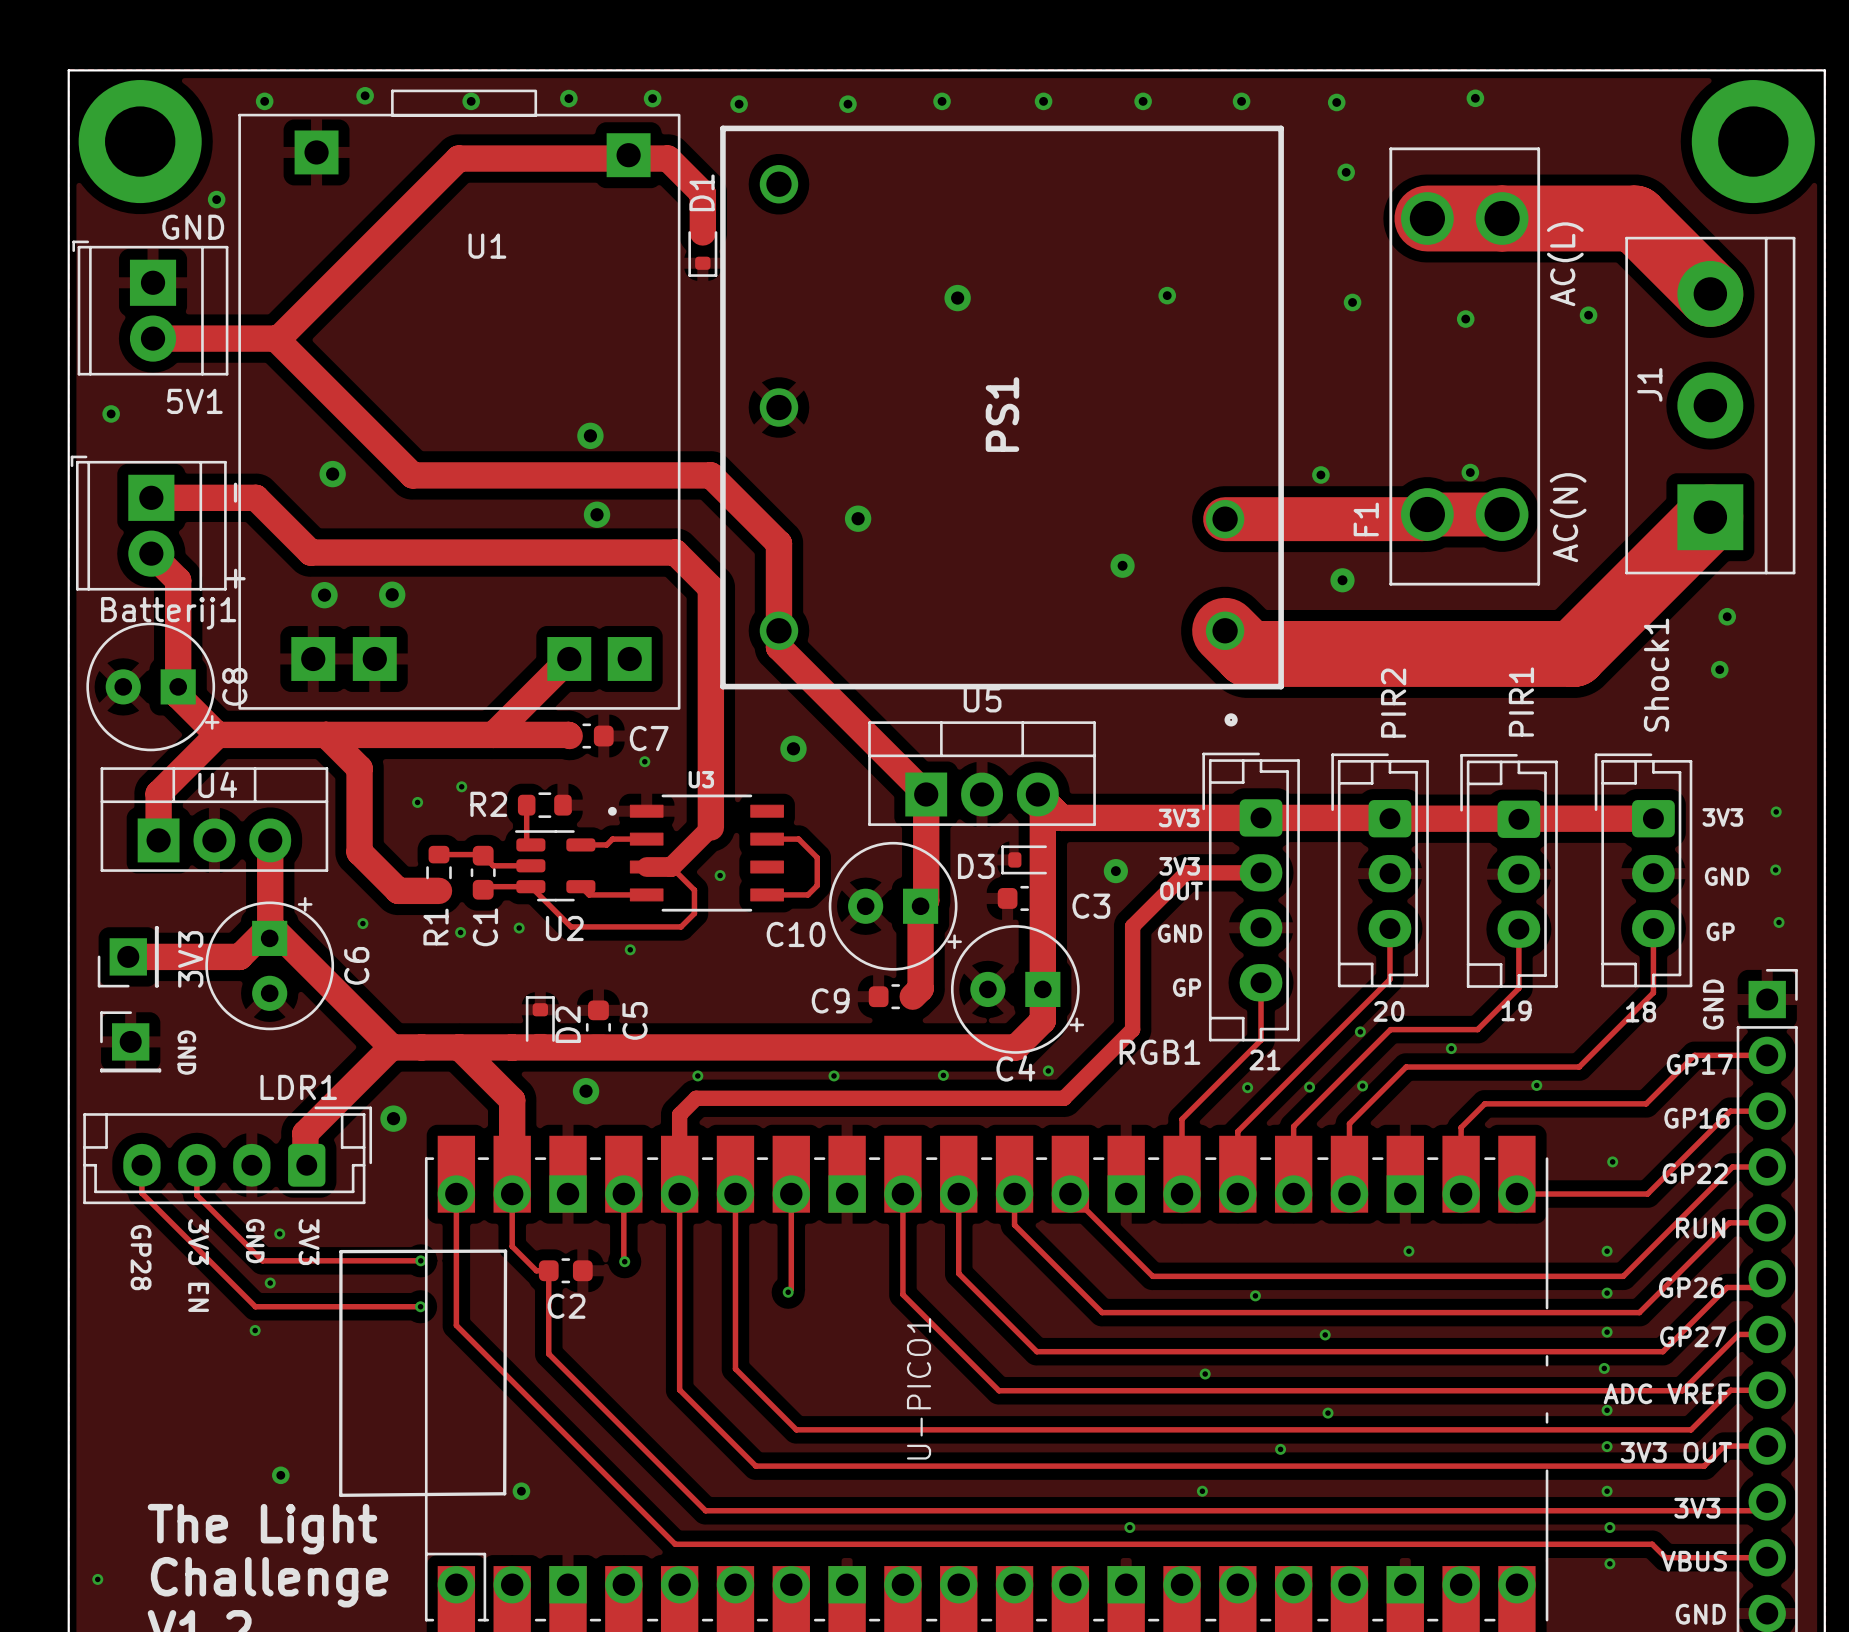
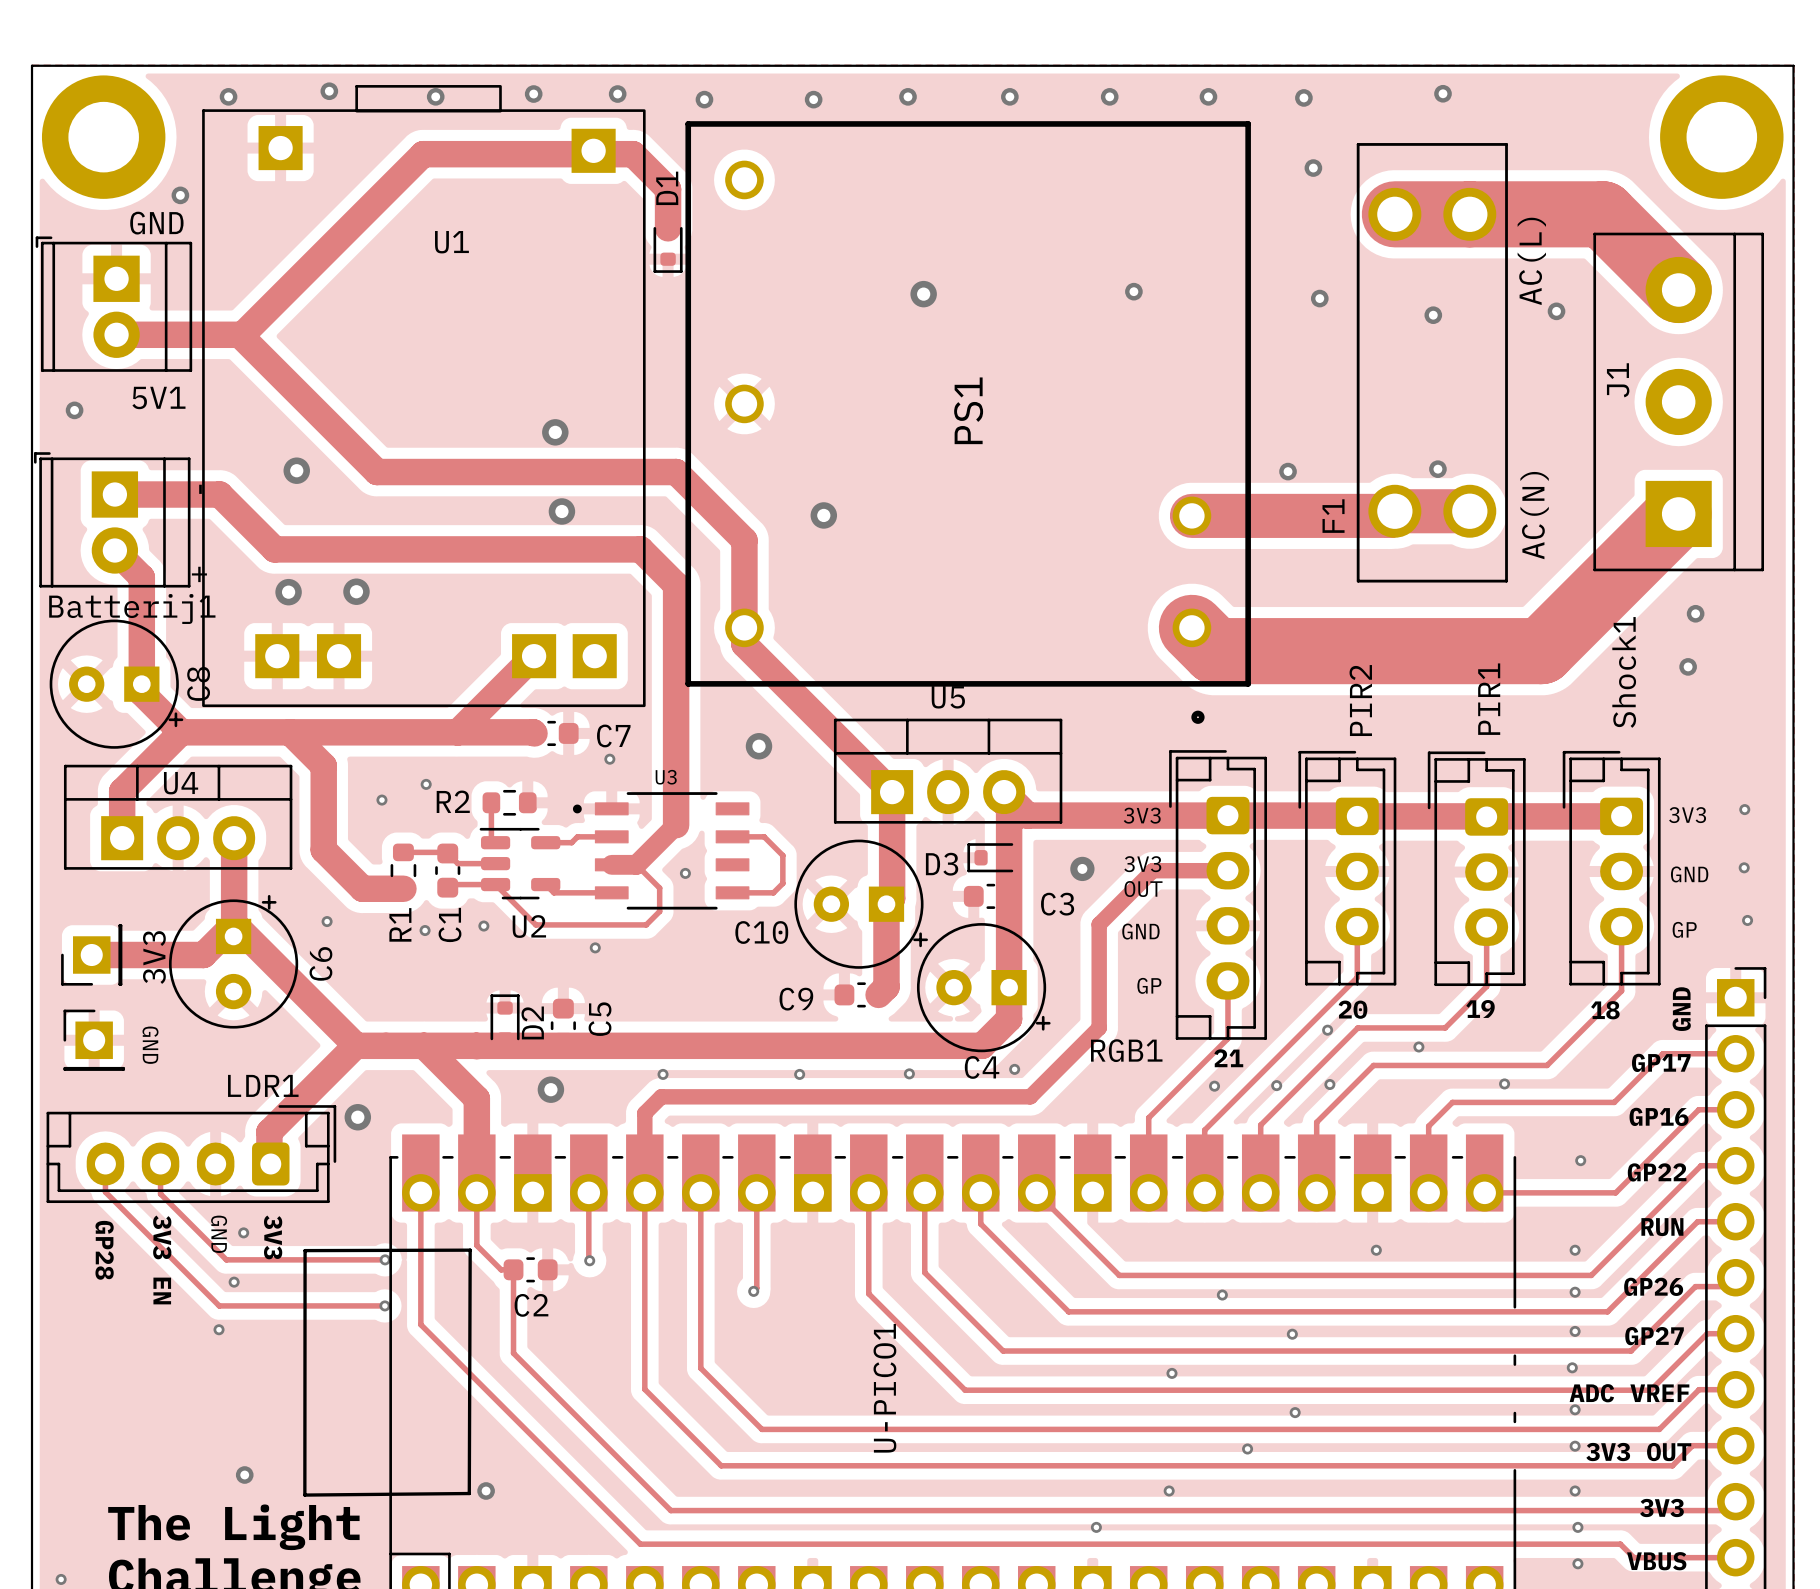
via: (1122, 565) -> none
via: (1342, 580) -> none

